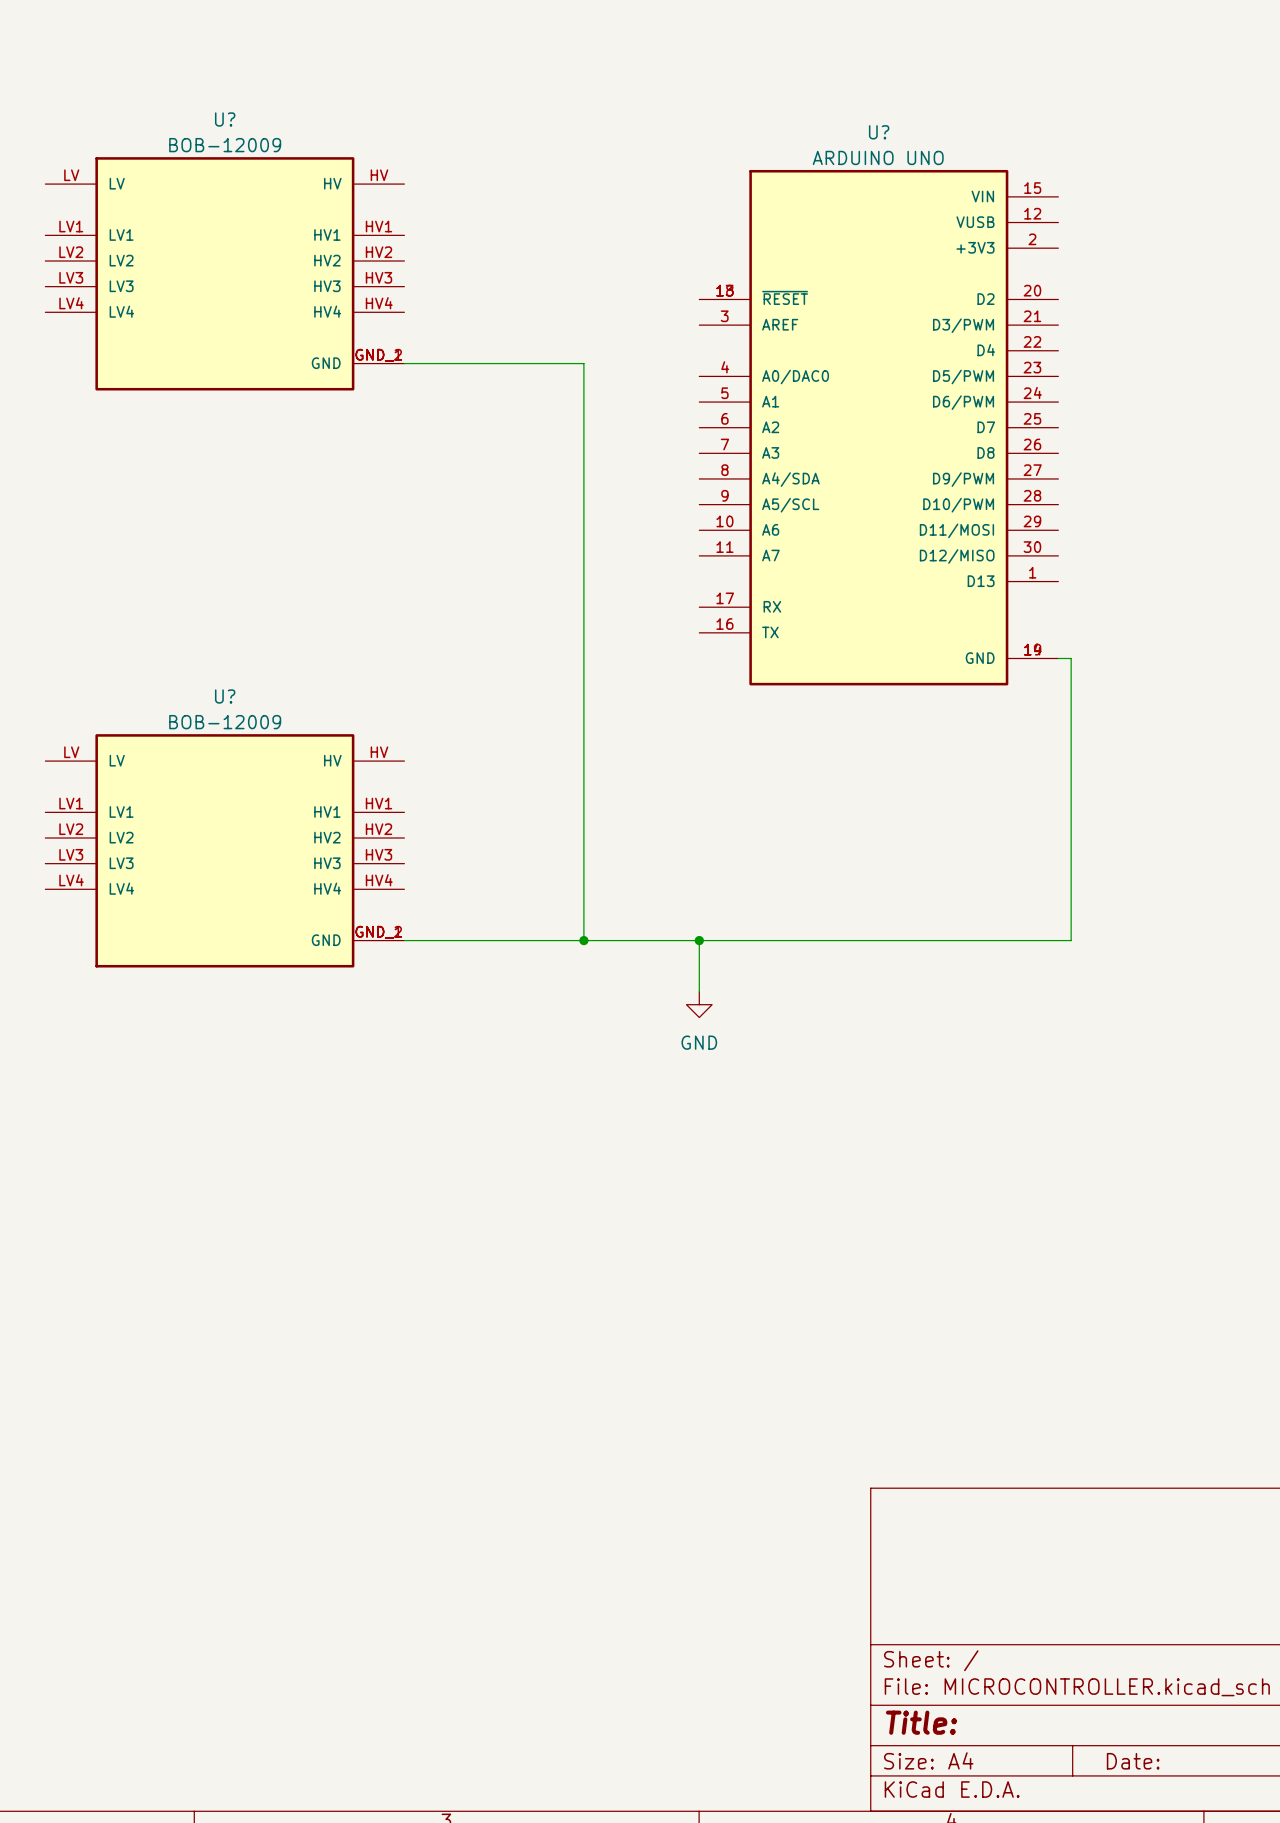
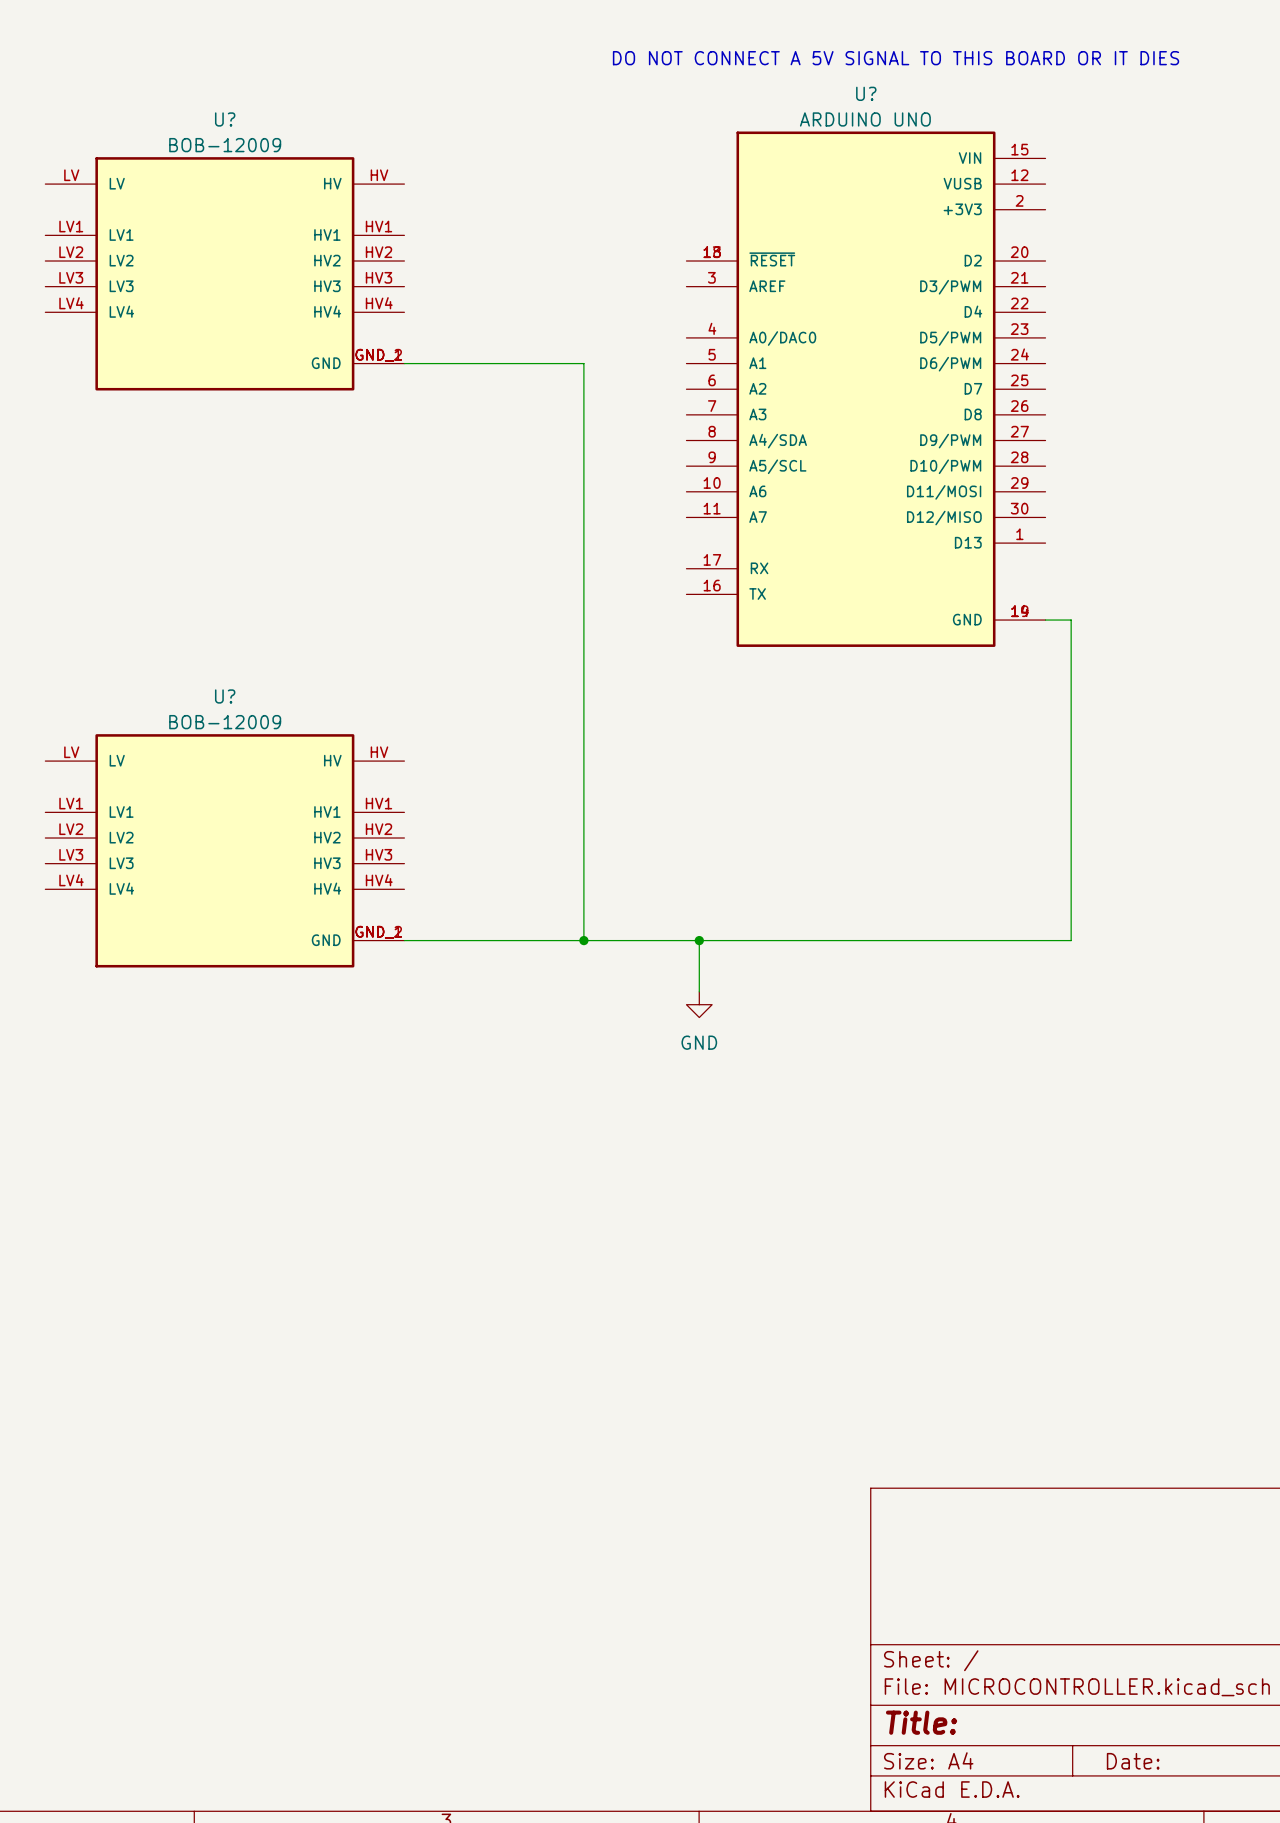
text: none -> DO NOT CONNECT A 5V SIGNAL TO THIS BOARD OR IT DIES (896, 58)
U? position: (878, 427) -> (866, 389)
wire: (1058, 658) (1071, 658) -> (1045, 620) (1071, 620) (1071, 658)

